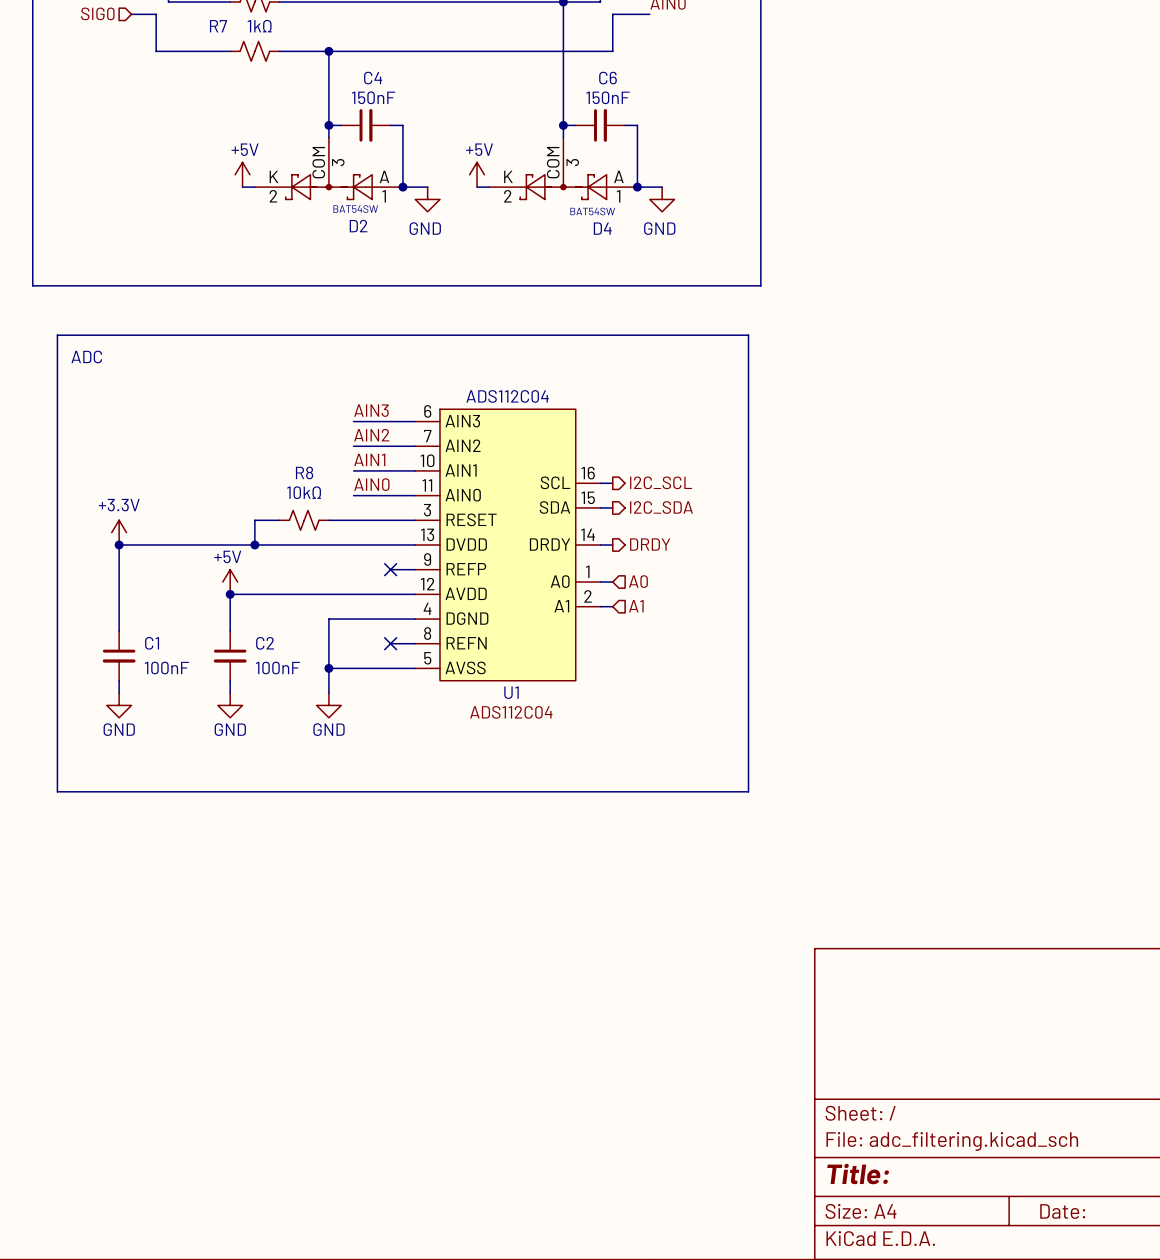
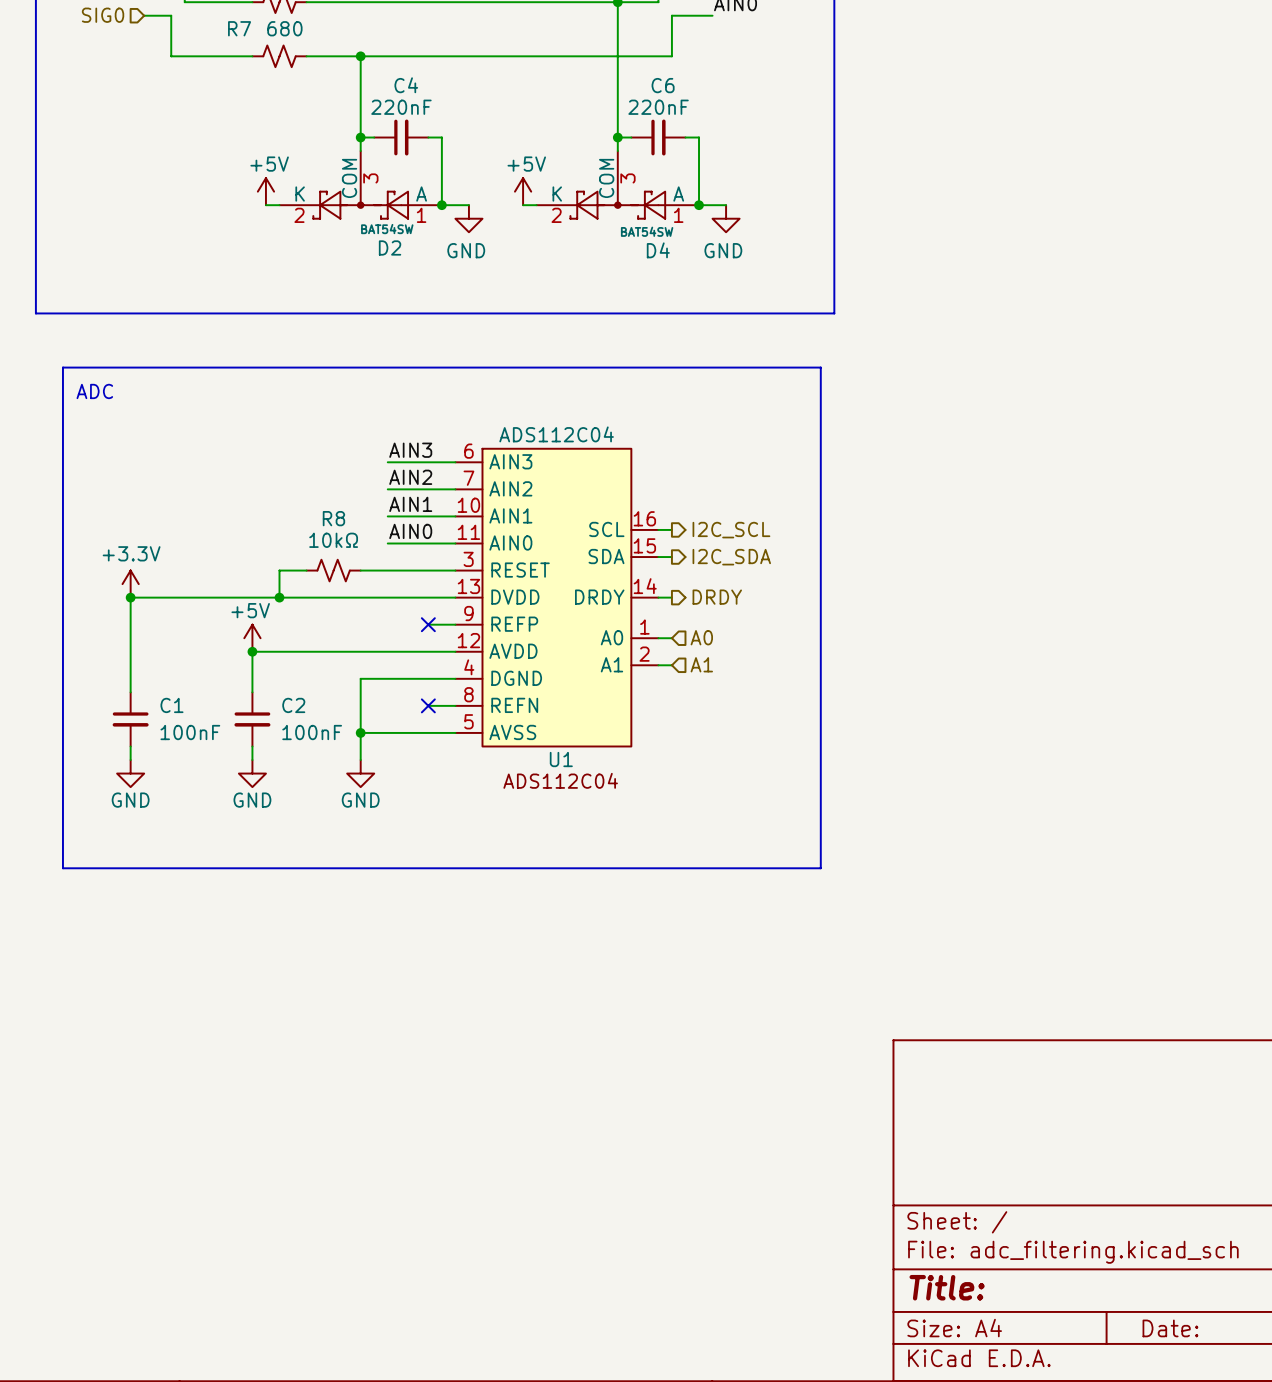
R7 value: 1kΩ (259, 26) -> 680 (284, 28)
C4 value: 150nF (373, 97) -> 220nF (401, 107)
C6 value: 150nF (608, 97) -> 220nF (658, 107)

